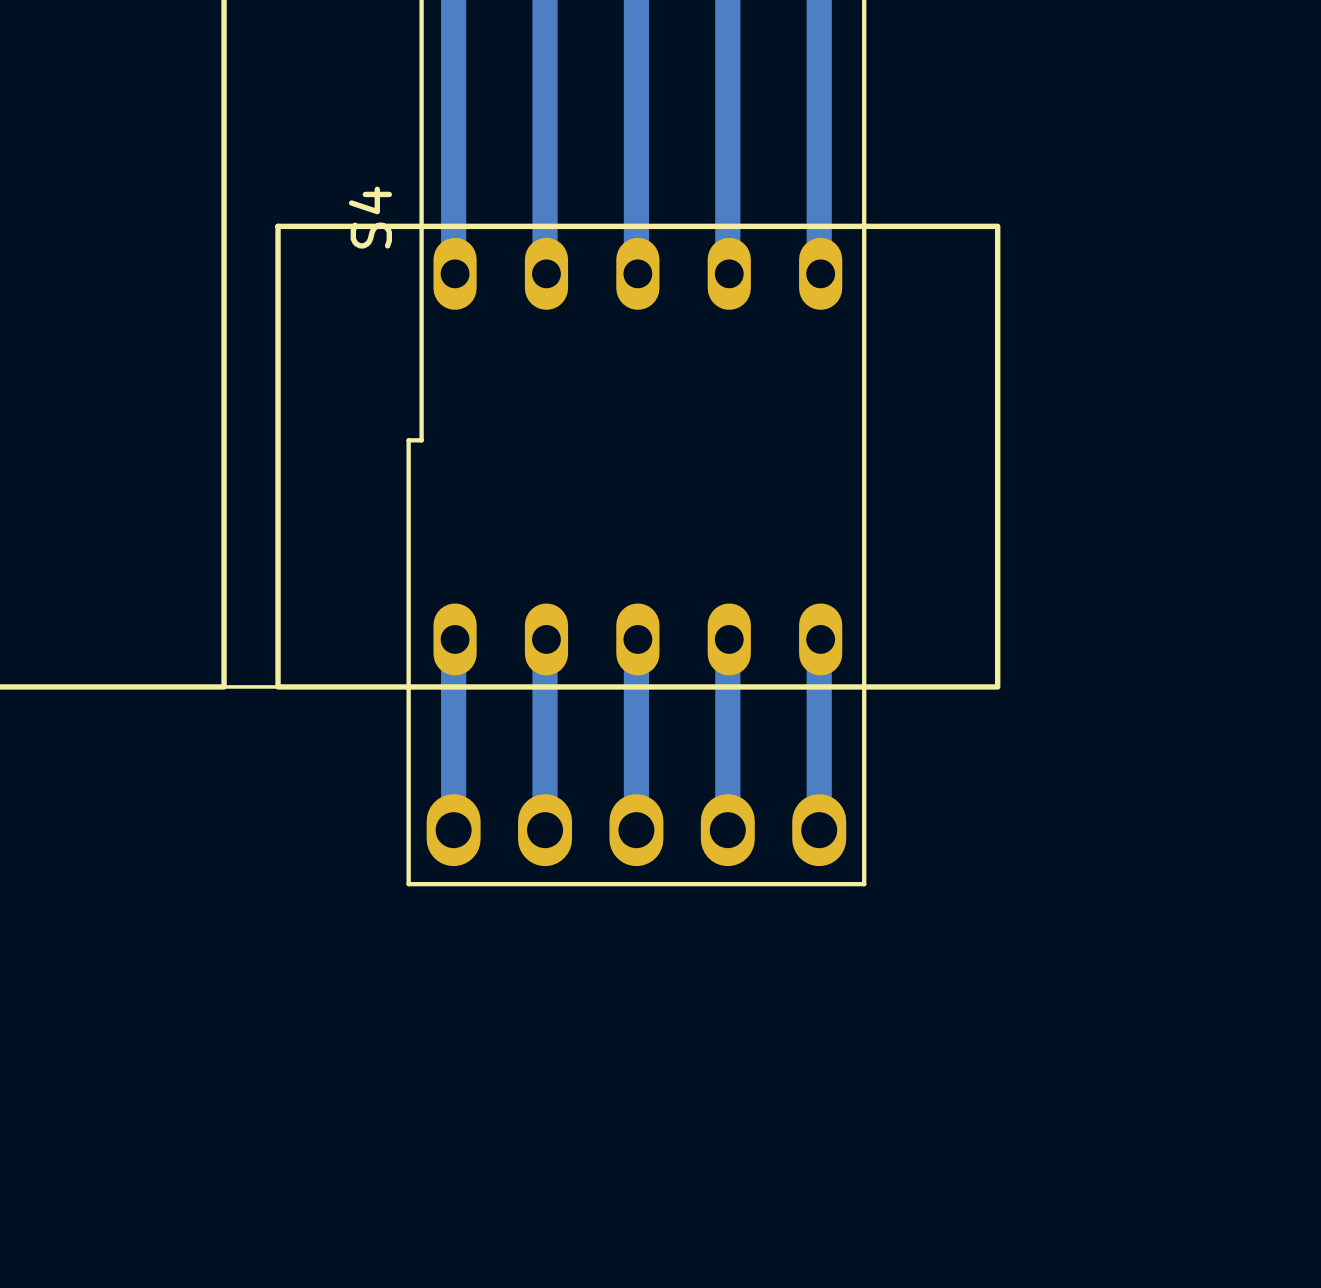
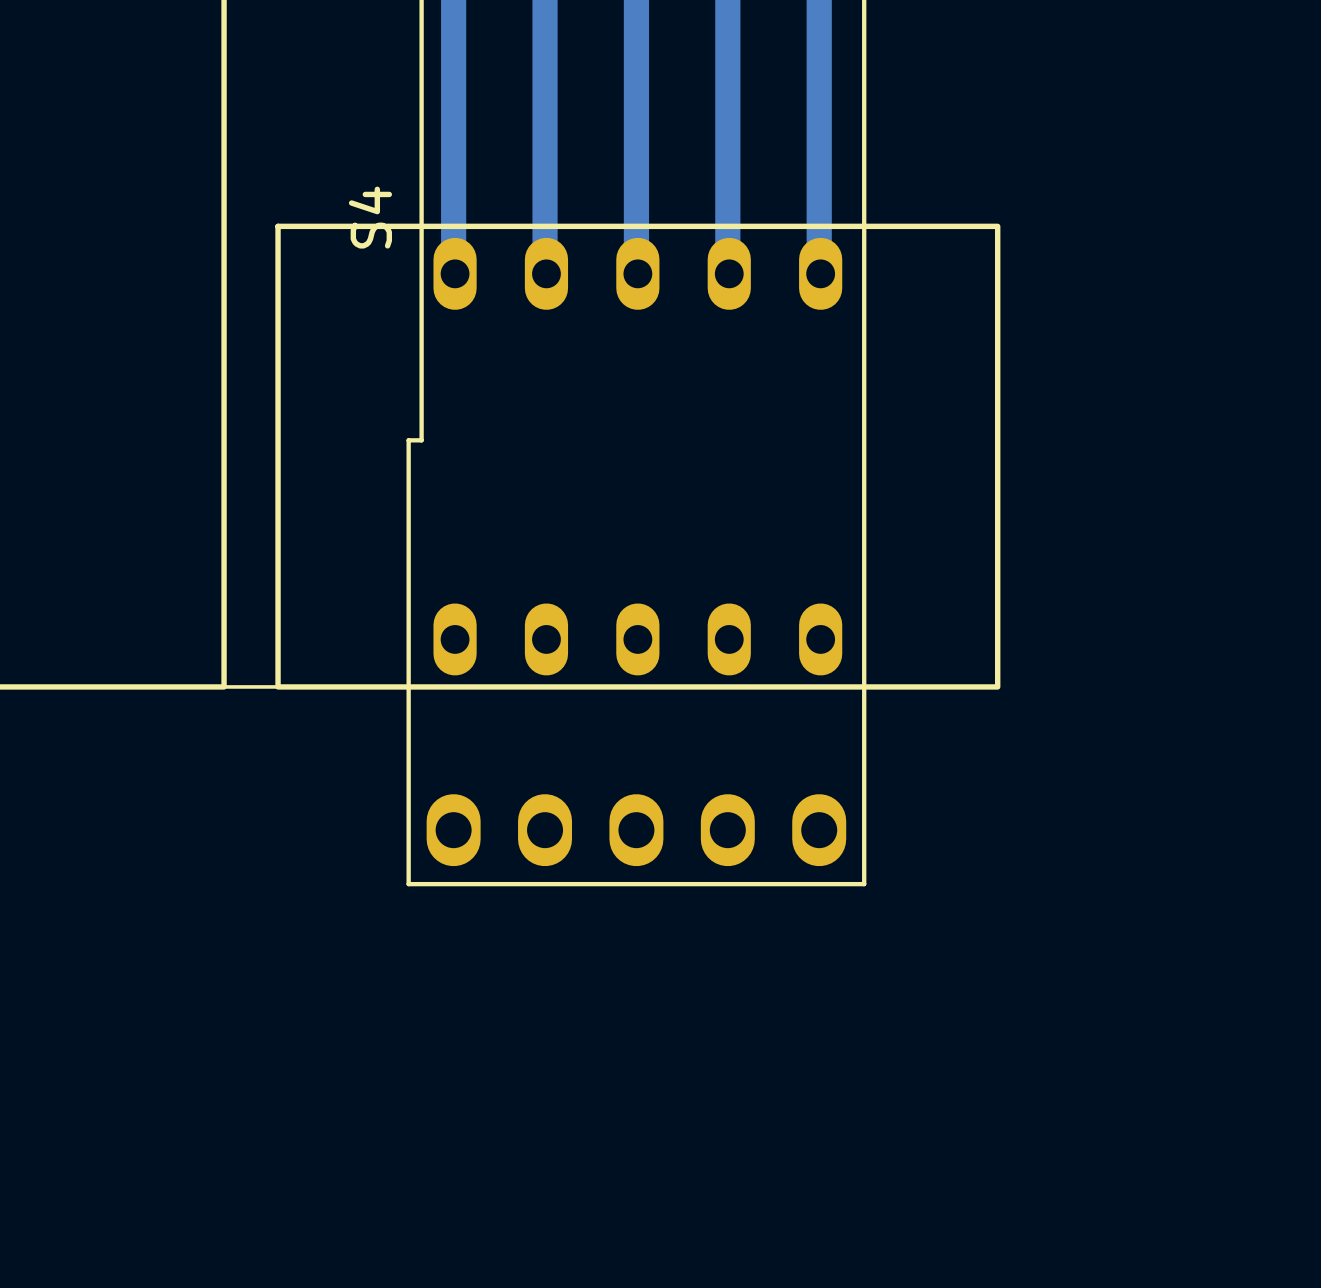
bottom track: (455, 639) (453, 830) -> none
bottom track: (546, 639) (545, 830) -> none
bottom track: (637, 639) (636, 830) -> none
bottom track: (729, 639) (727, 830) -> none
bottom track: (820, 639) (819, 830) -> none

